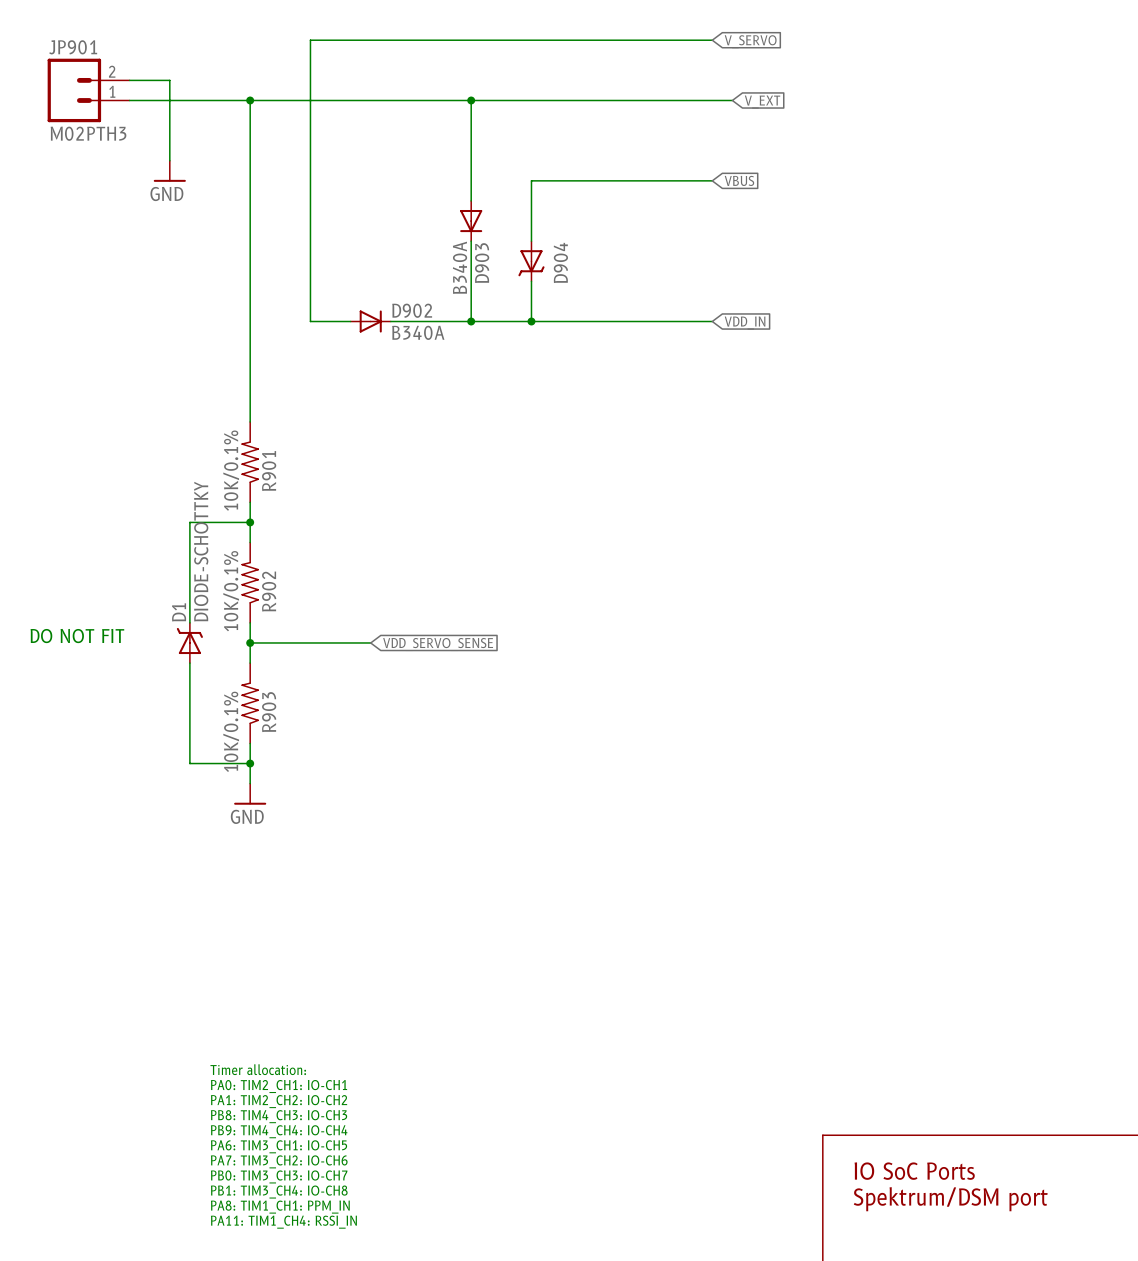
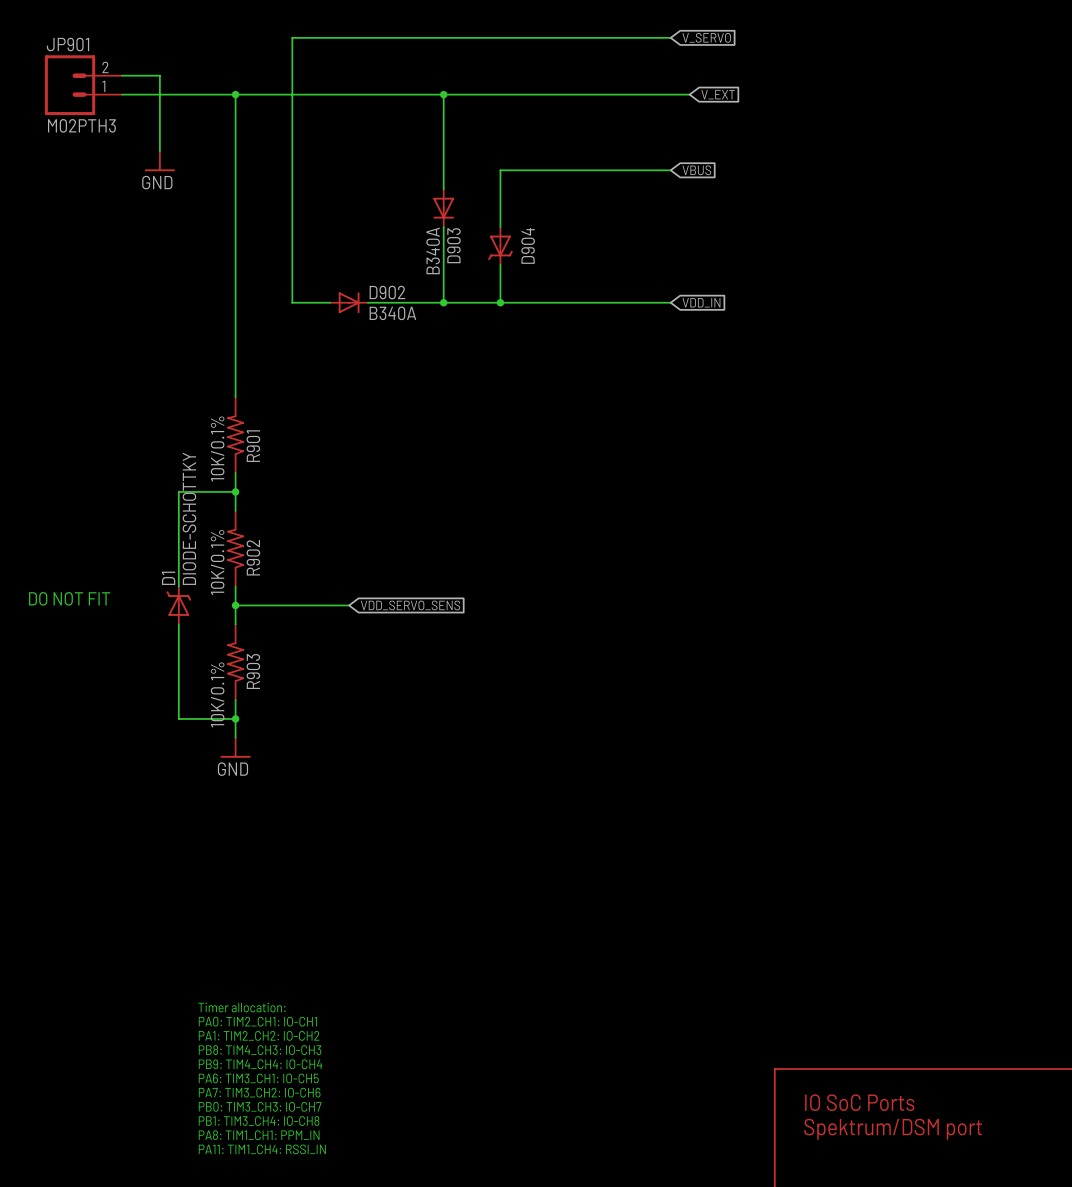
global label: VDD_SERVO_SENSE (438, 644) -> VDD_SERVO_SENS (410, 605)

